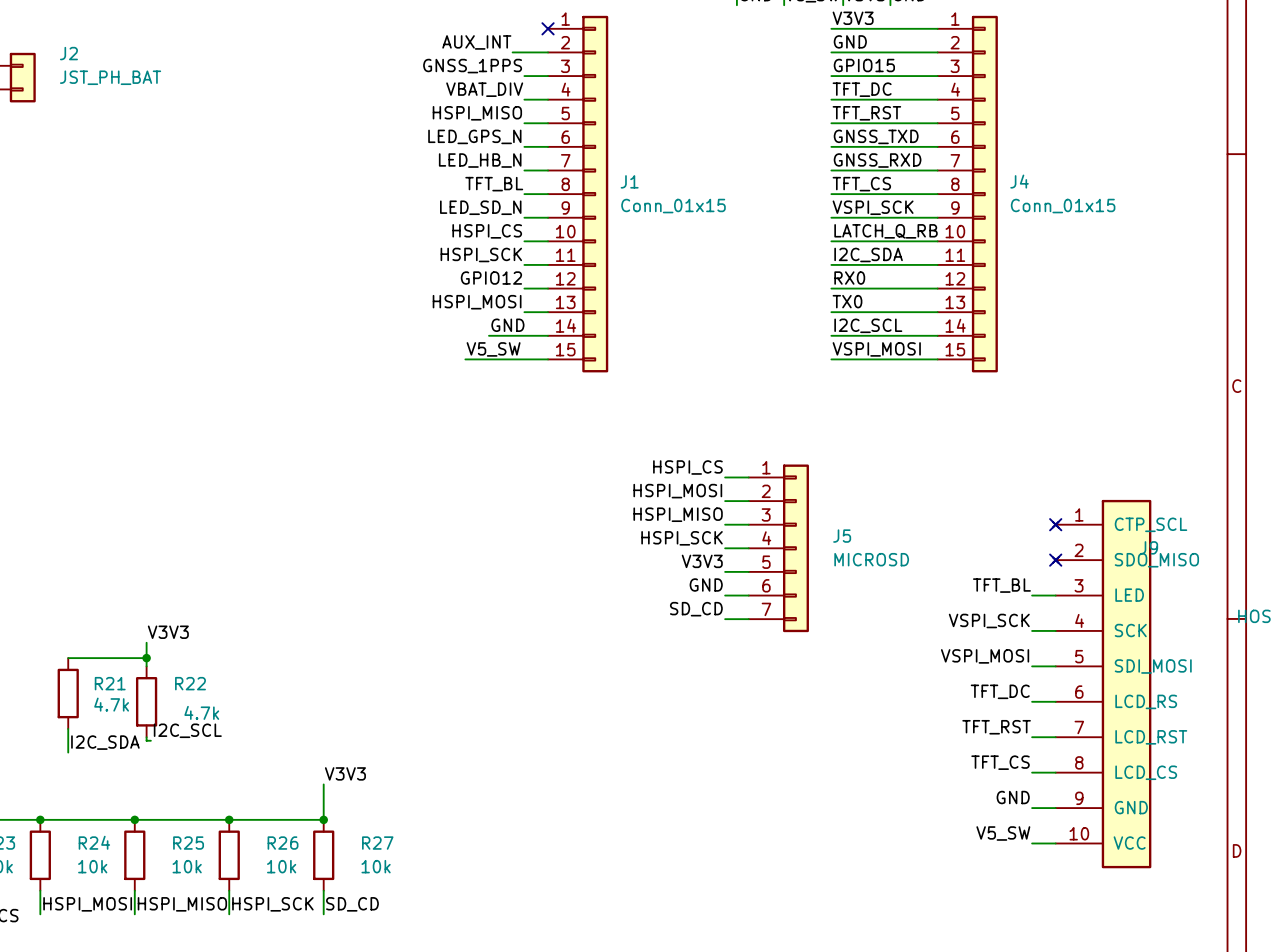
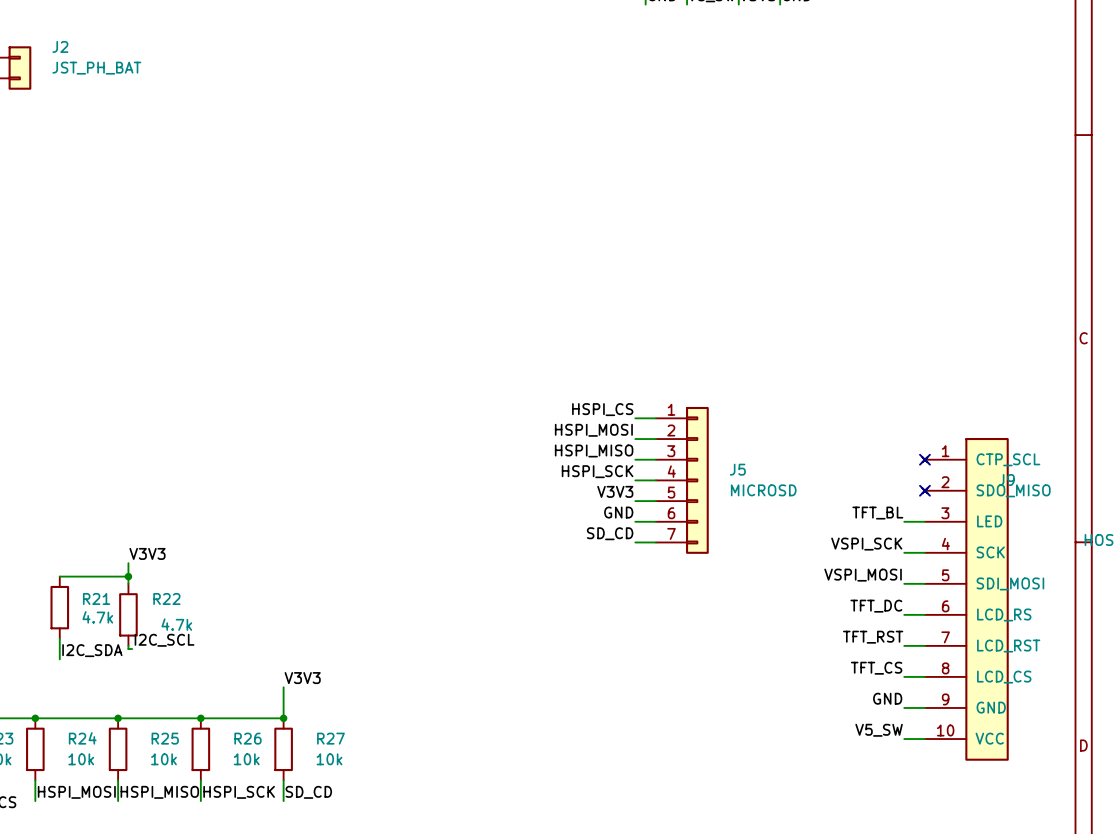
label: V3V3 (853, 18) -> none
no-connect mark: (548, 28) -> none
wire: (831, 28) (937, 28) -> none
label: GND (850, 41) -> none
label: AUX_INT (476, 42) -> none
wire: (512, 52) (548, 52) -> none
wire: (831, 52) (937, 52) -> none
label: GPIO15 (864, 65) -> none
label: GNSS_1PPS (472, 66) -> none
wire: (524, 76) (548, 76) -> none
wire: (831, 76) (937, 76) -> none
label: VBAT_DIV (484, 89) -> none
label: TFT_DC (862, 89) -> none
wire: (524, 99) (548, 99) -> none
wire: (831, 99) (937, 99) -> none
label: HSPI_MISO (477, 113) -> none
label: TFT_RST (866, 113) -> none
wire: (524, 123) (548, 123) -> none
wire: (831, 123) (937, 123) -> none
label: LED_GPS_N (474, 136) -> none
label: GNSS_TXD (876, 136) -> none
wire: (524, 146) (548, 146) -> none
wire: (831, 146) (937, 146) -> none
label: LED_HB_N (480, 160) -> none
label: GNSS_RXD (877, 160) -> none
wire: (524, 170) (548, 170) -> none
wire: (831, 170) (937, 170) -> none
label: TFT_BL (494, 184) -> none
label: TFT_CS (861, 184) -> none
wire: (524, 194) (548, 194) -> none
J1: Conn_01x15 (578, 194) -> none
wire: (831, 194) (937, 194) -> none
J4: Conn_01x15 (967, 194) -> none
label: LED_SD_N (480, 207) -> none
label: VSPI_SCK (873, 207) -> none
wire: (524, 217) (548, 217) -> none
wire: (831, 217) (937, 217) -> none
label: HSPI_CS (487, 231) -> none
label: LATCH_Q_RB (886, 231) -> none
wire: (524, 241) (548, 241) -> none
wire: (831, 241) (937, 241) -> none
label: HSPI_SCK (481, 254) -> none
label: I2C_SDA (868, 254) -> none
wire: (524, 264) (548, 264) -> none
wire: (831, 264) (937, 264) -> none
label: GPIO12 (491, 278) -> none
label: RX0 (849, 278) -> none
wire: (524, 288) (548, 288) -> none
wire: (831, 288) (937, 288) -> none
label: TX0 (847, 301) -> none
label: HSPI_MOSI (477, 302) -> none
wire: (524, 312) (548, 312) -> none
wire: (831, 312) (937, 312) -> none
label: GND (507, 325) -> none
label: I2C_SCL (868, 325) -> none
wire: (488, 335) (548, 335) -> none
wire: (831, 335) (937, 335) -> none
label: V5_SW (493, 349) -> none
label: VSPI_MOSI (876, 349) -> none
wire: (465, 359) (548, 359) -> none
wire: (831, 359) (937, 359) -> none

